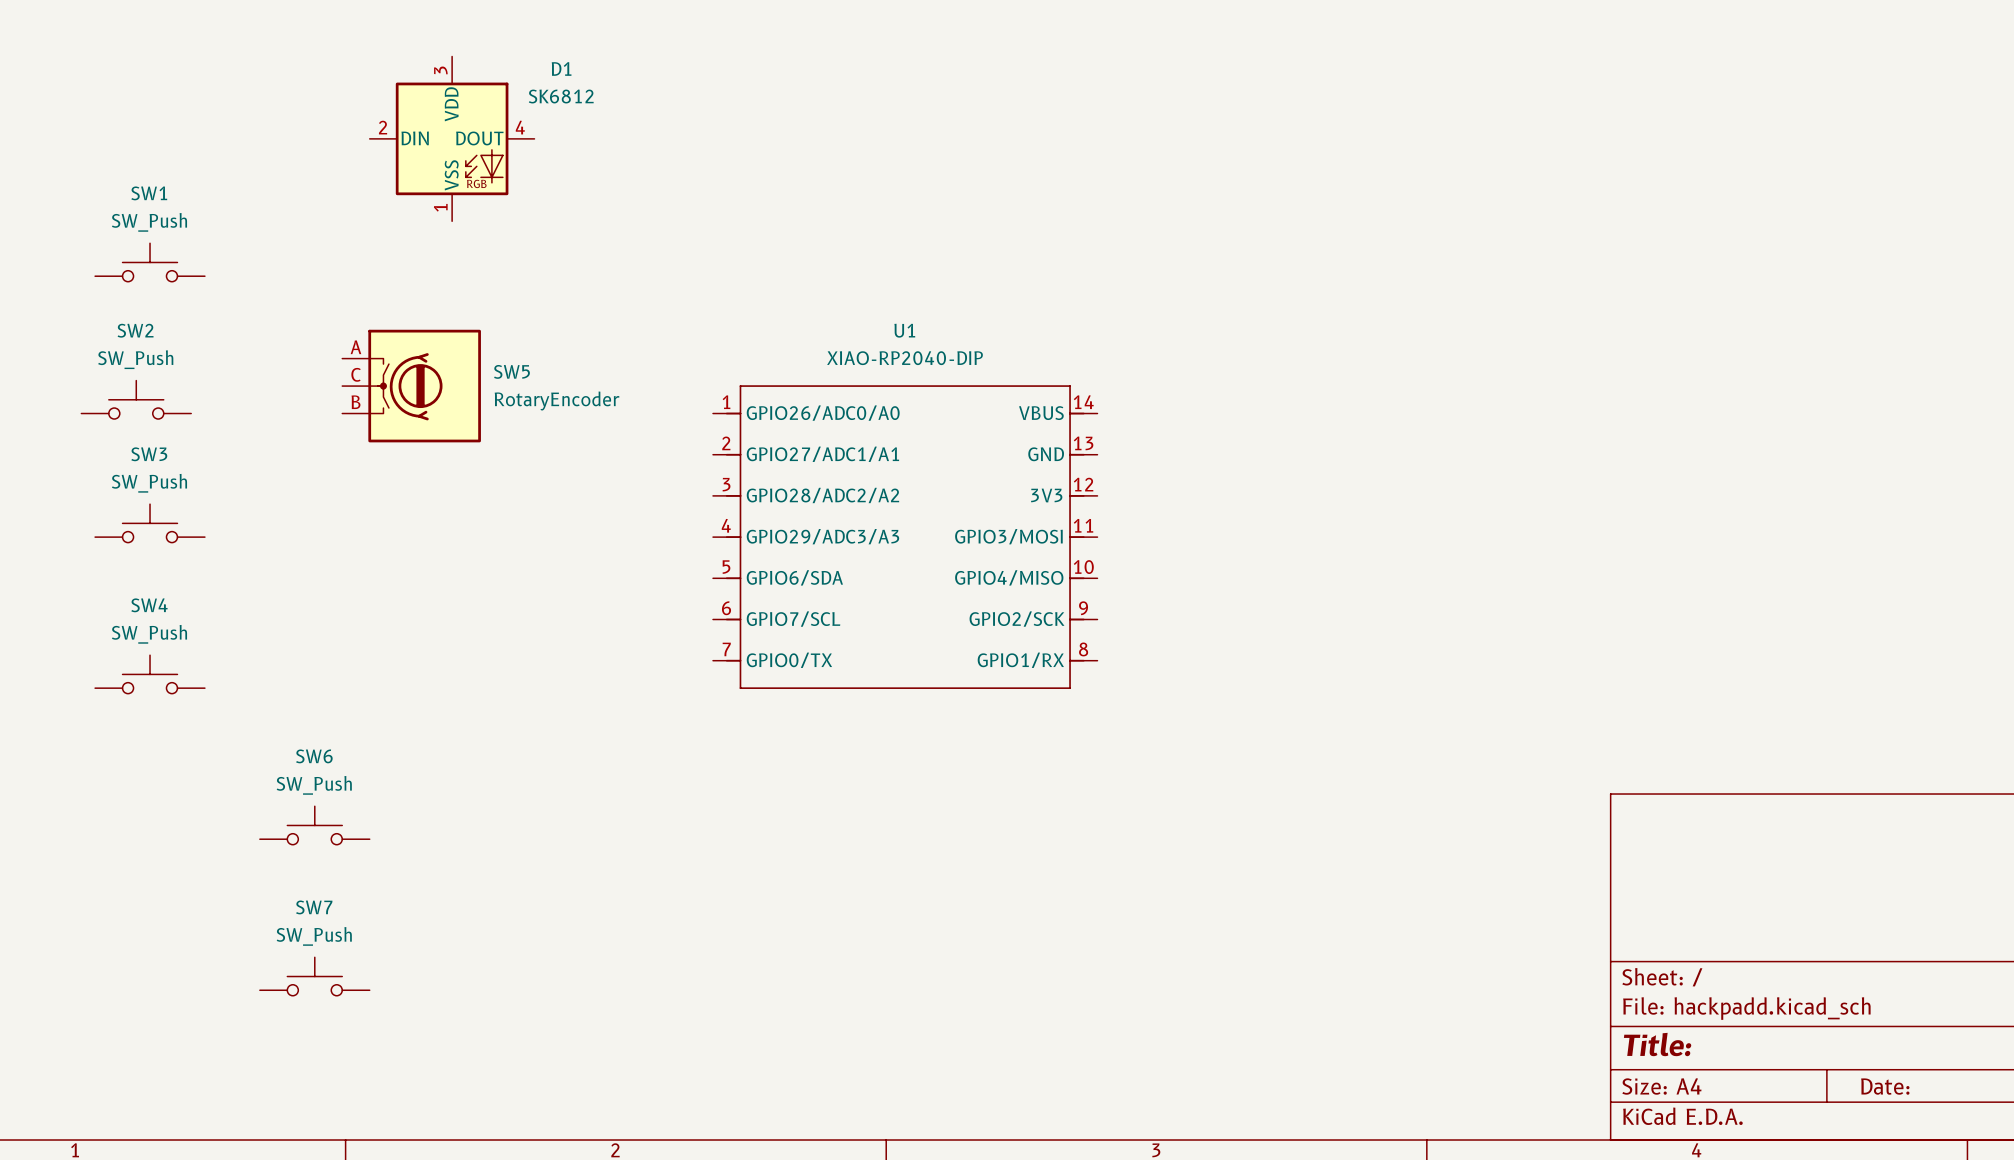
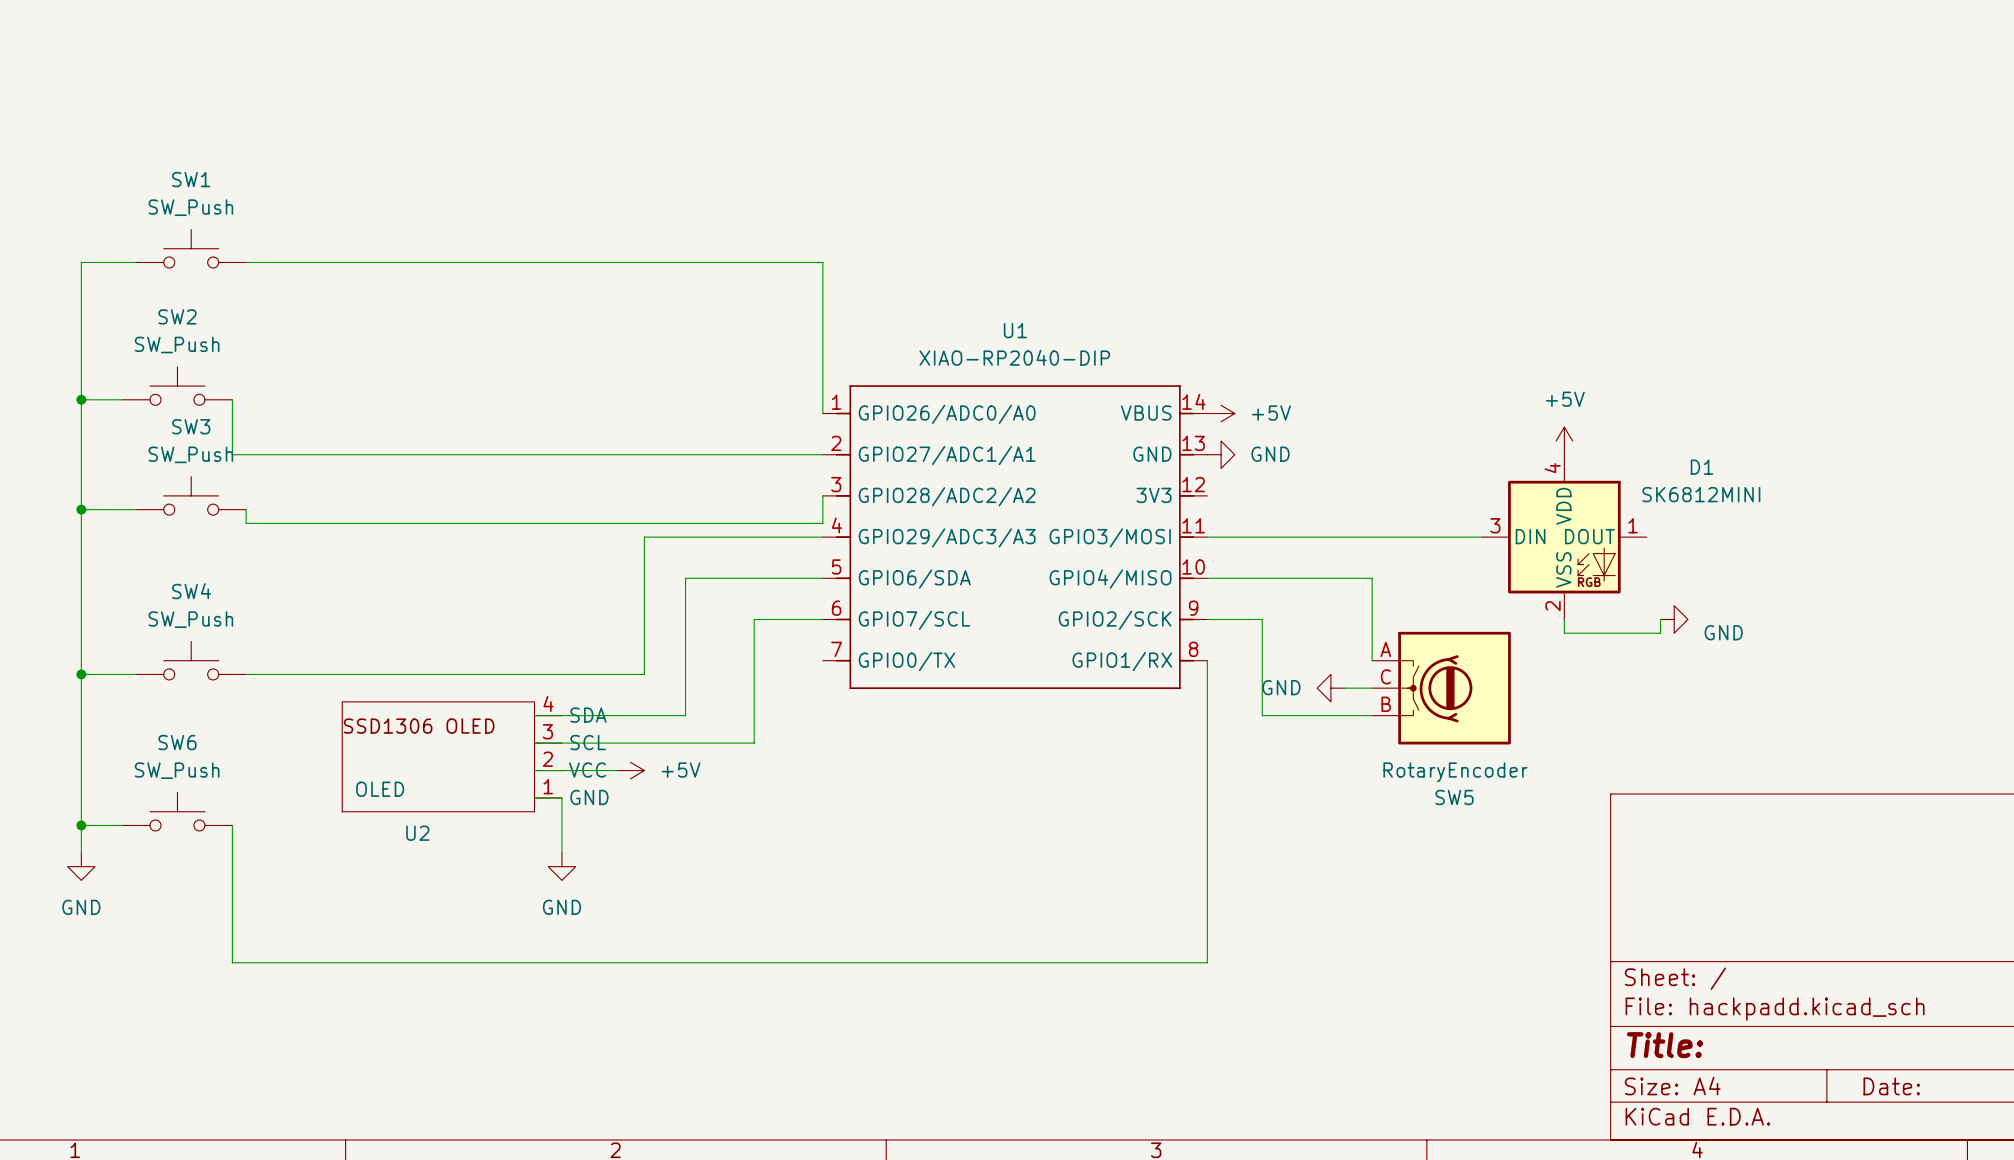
D1 name position: D1 (561, 68) -> D1 (1702, 467)
D1 pin number: 3 (440, 70) -> 4 (1552, 468)
D1 value: SK6812 (561, 96) -> SK6812MINI (1701, 494)
D1 pin number: 2 (383, 127) -> 3 (1495, 525)
D1 pin number: 4 (520, 127) -> 1 (1633, 525)
D1 position: (452, 138) -> (1564, 537)
D1 pin number: 1 (440, 207) -> 2 (1553, 606)
wire: none -> (136, 262) (81, 262) (81, 852)
SW1 position: (150, 262) -> (191, 248)
wire: none -> (246, 262) (822, 262) (822, 413)
SW5 name position: SW5 (511, 371) -> SW5 (1454, 797)
SW5 position: (411, 386) -> (1441, 688)
wire: none -> (81, 399) (122, 399)
junction: none -> (81, 399)
SW2 position: (136, 399) -> (177, 386)
wire: none -> (232, 399) (232, 454) (822, 454)
SW5 value position: RotaryEncoder (557, 400) -> RotaryEncoder (1455, 772)
power symbol: none -> +5V (1221, 413)
power symbol: none -> +5V (1564, 440)
power symbol: none -> GND (1221, 454)
wire: none -> (822, 495) (822, 523) (246, 523) (246, 509)
wire: none -> (81, 509) (136, 509)
junction: none -> (81, 509)
SW3 position: (150, 523) -> (191, 495)
wire: none -> (822, 537) (644, 537) (644, 674) (246, 674)
U1 position: (905, 537) -> (1015, 537)
wire: none -> (1207, 537) (1481, 537)
wire: none -> (822, 578) (685, 578) (685, 715) (534, 715)
wire: none -> (1207, 578) (1372, 578) (1372, 660)
wire: none -> (822, 619) (754, 619) (754, 743) (534, 743)
wire: none -> (1207, 619) (1262, 619) (1262, 715) (1372, 715)
wire: none -> (1564, 619) (1564, 633) (1660, 633) (1660, 619)
power symbol: none -> GND (1674, 619)
wire: none -> (1207, 660) (1207, 962) (232, 962) (232, 825)
wire: none -> (81, 674) (136, 674)
junction: none -> (81, 674)
SW4 position: (150, 674) -> (191, 660)
power symbol: none -> GND (1330, 688)
wire: none -> (1344, 688) (1372, 688)
U2: none -> OLED (452, 756)
wire: none -> (534, 770) (616, 770)
power symbol: none -> +5V (630, 770)
wire: none -> (534, 798) (561, 798) (561, 852)
wire: none -> (81, 825) (122, 825)
junction: none -> (81, 825)
SW6 position: (314, 825) -> (177, 811)
power symbol: none -> GND (81, 866)
power symbol: none -> GND (561, 866)
SW7: SW_Push (314, 976) -> none

